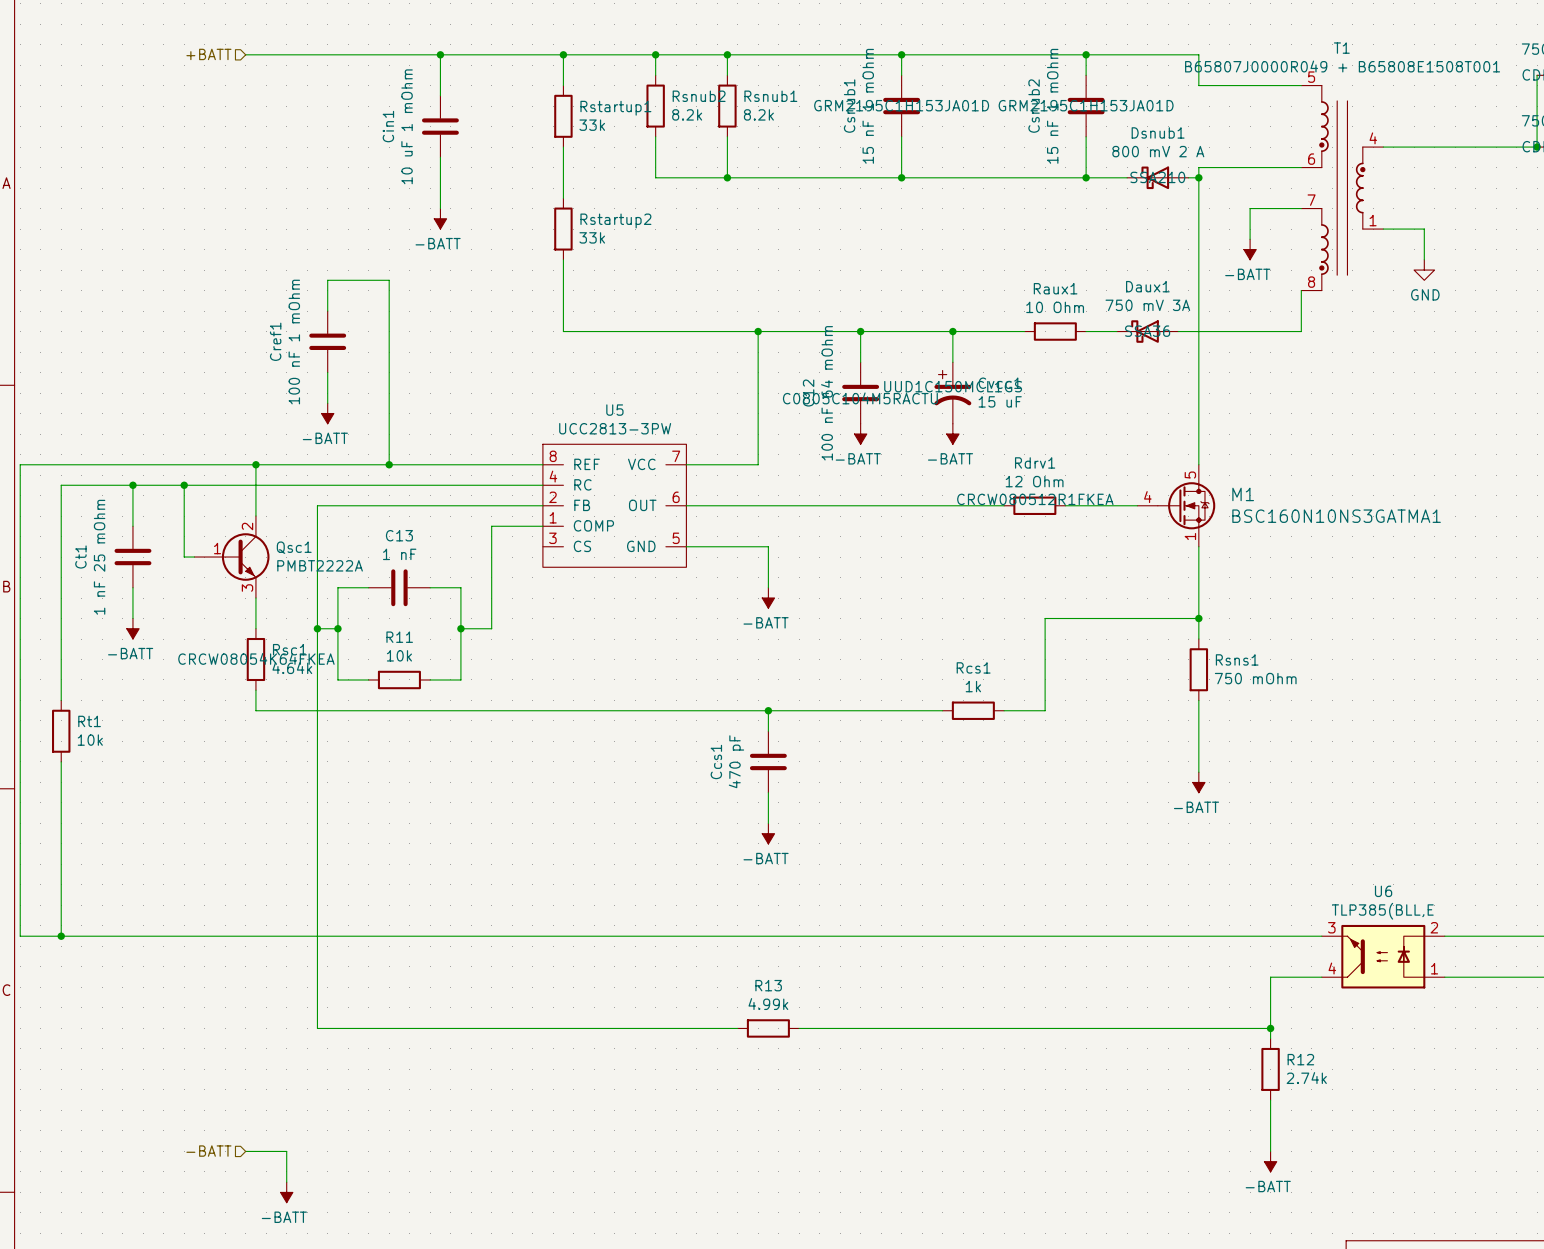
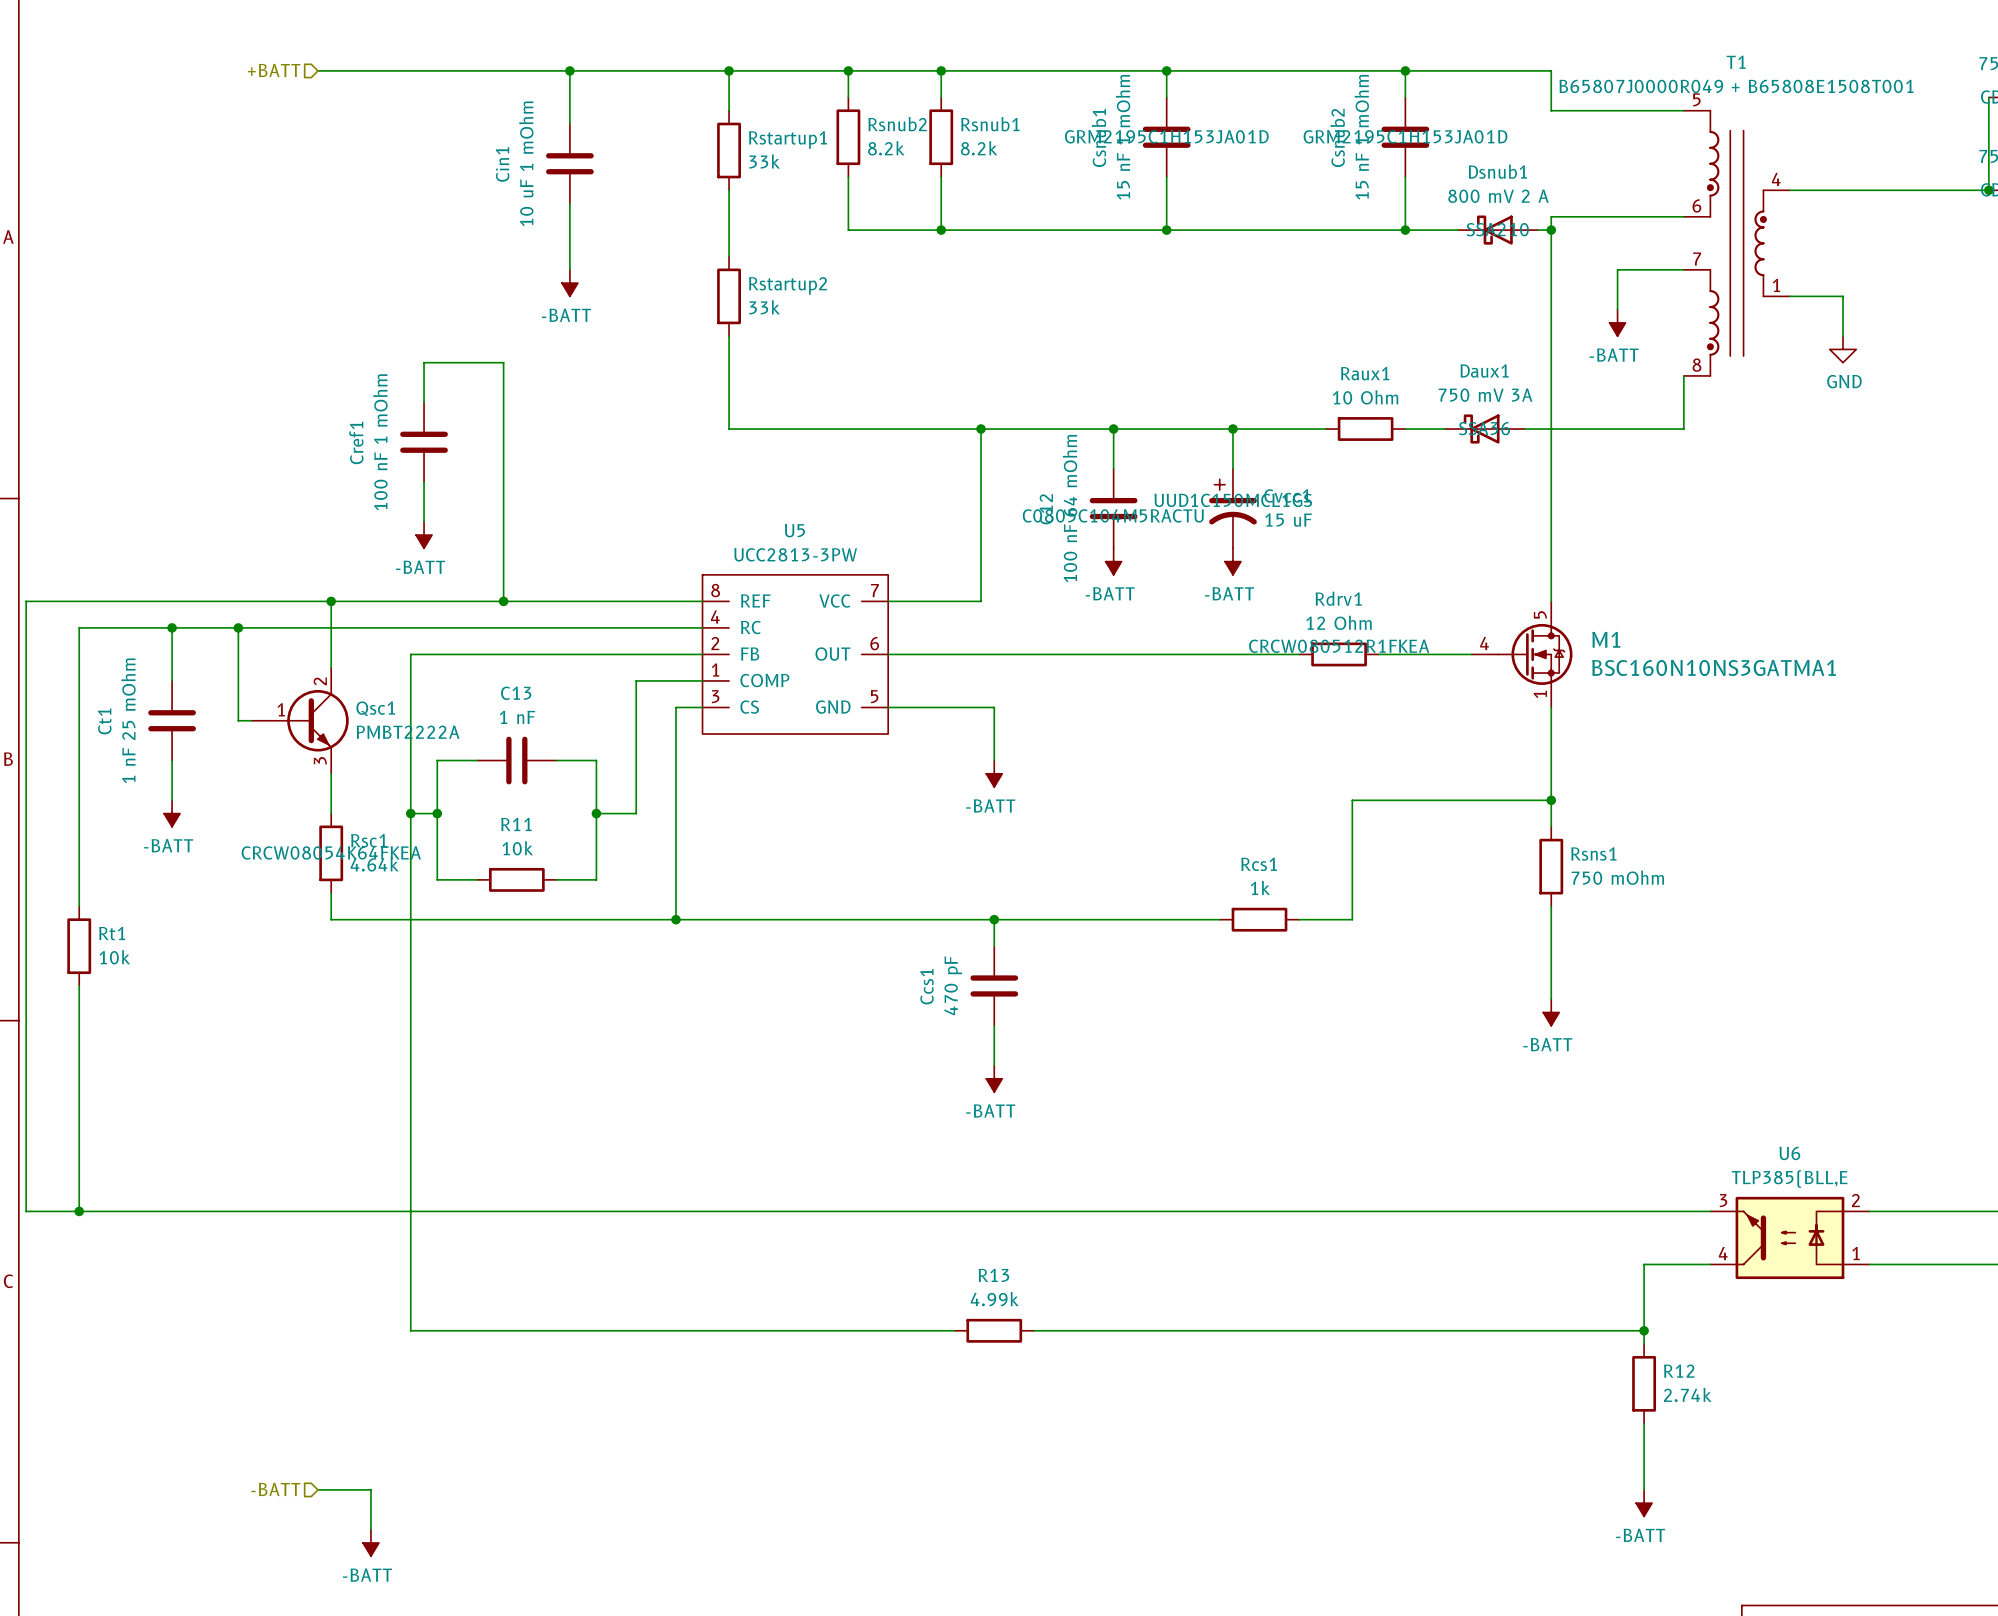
wire: none -> (702, 707) (676, 707) (676, 919)
junction: none -> (676, 919)

